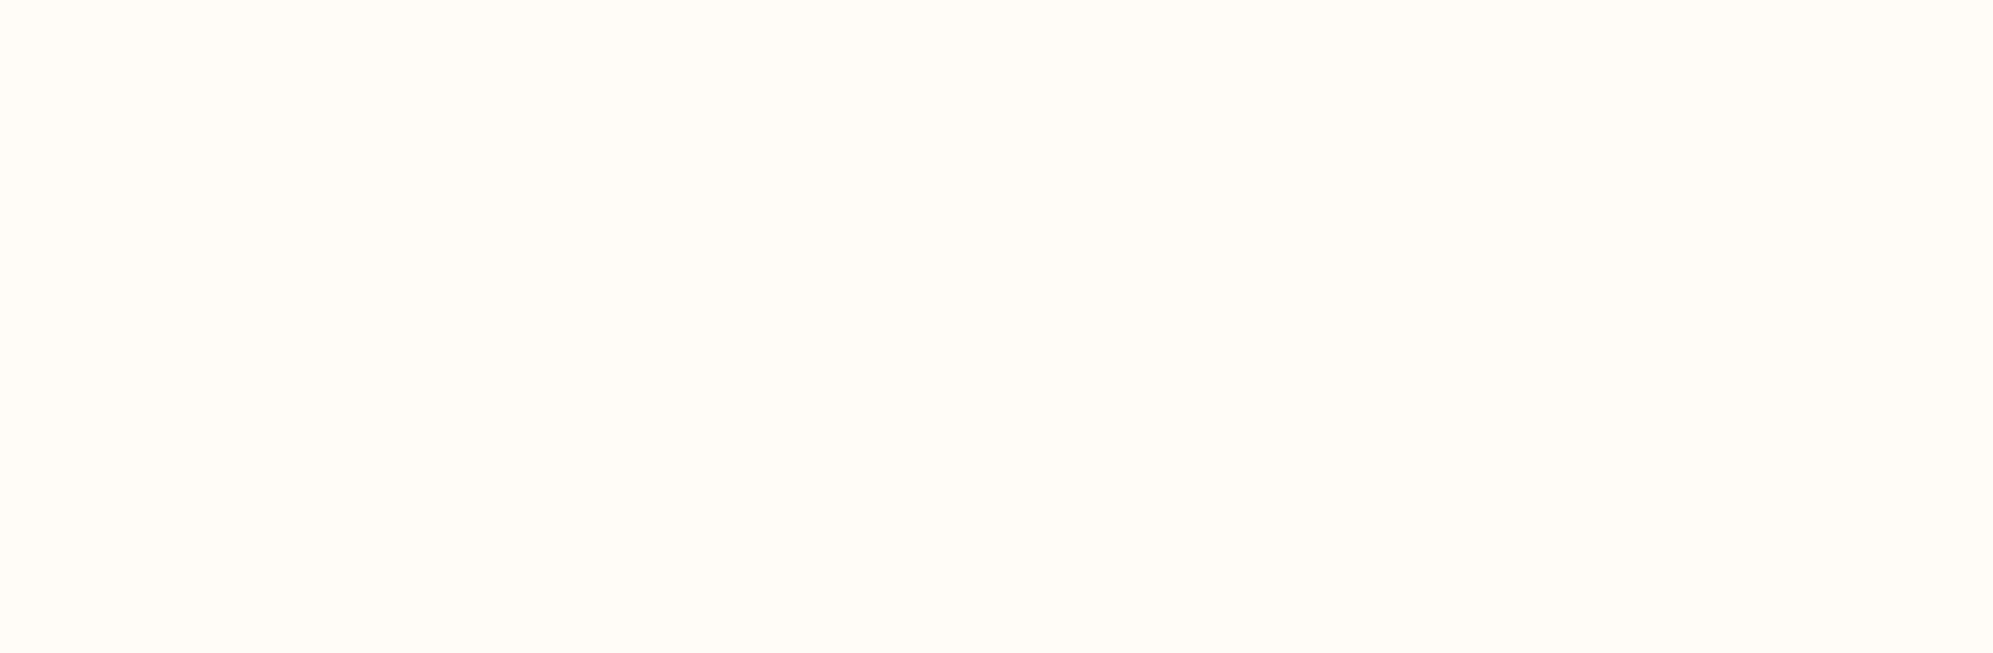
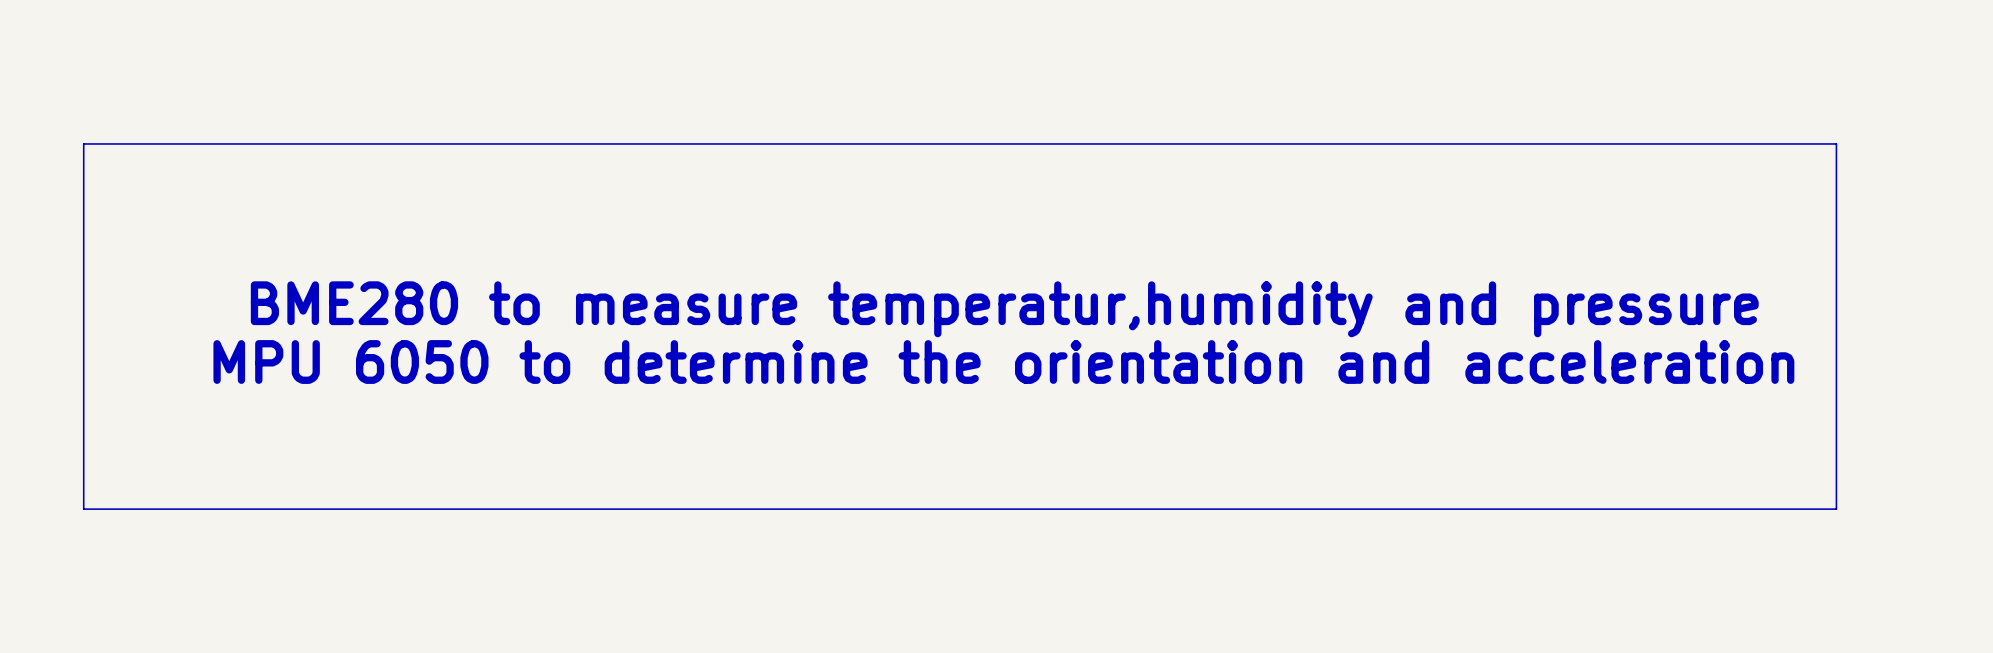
line: none -> (83, 143) (1836, 143) (1836, 509) (83, 509) (83, 143)
text: none -> BME280 to measure temperatur,humidity and pressure (1004, 309)
text: none -> MPU 6050 to determine the orientation and acceleration (1003, 361)

